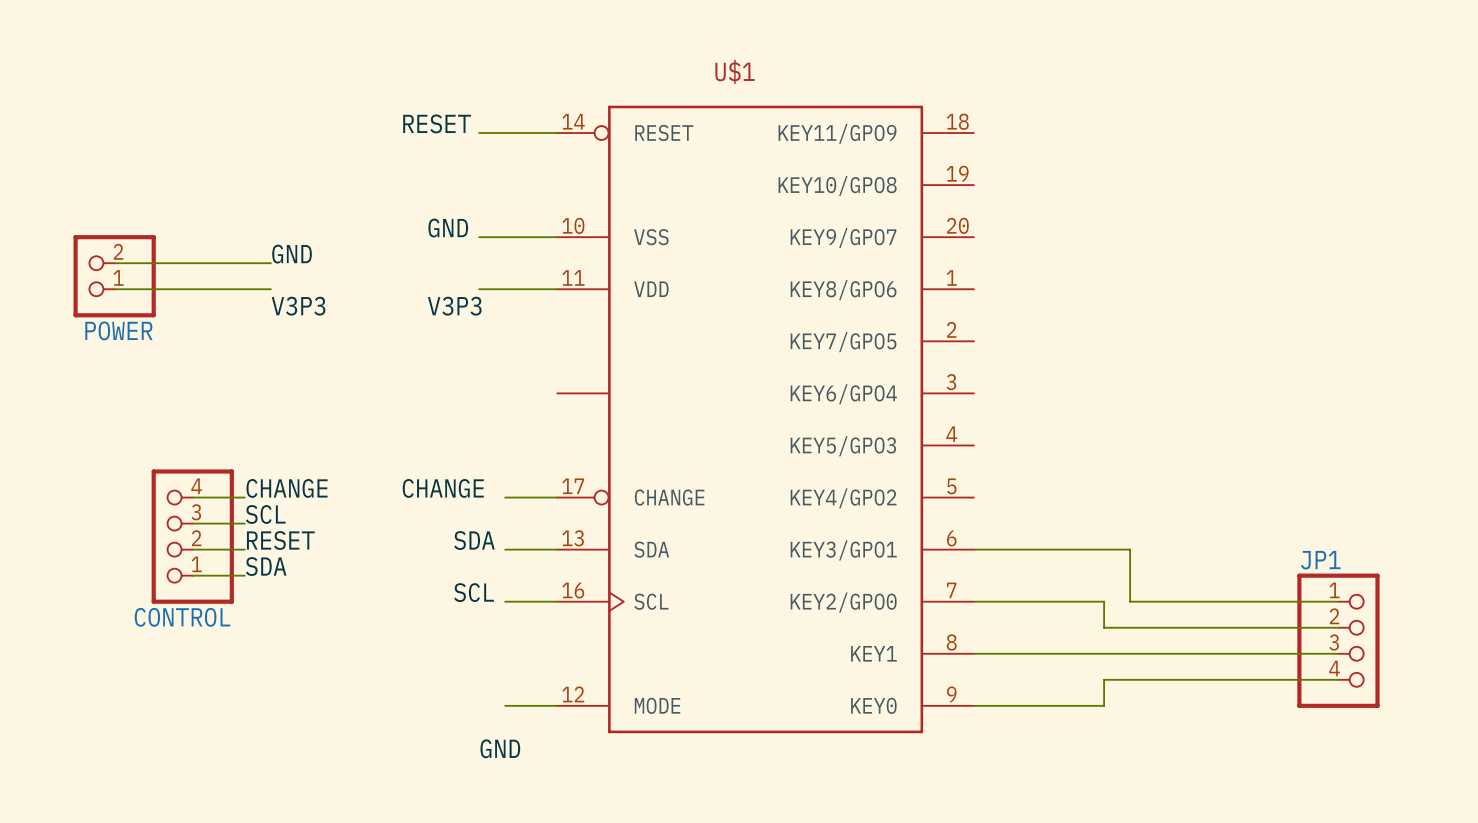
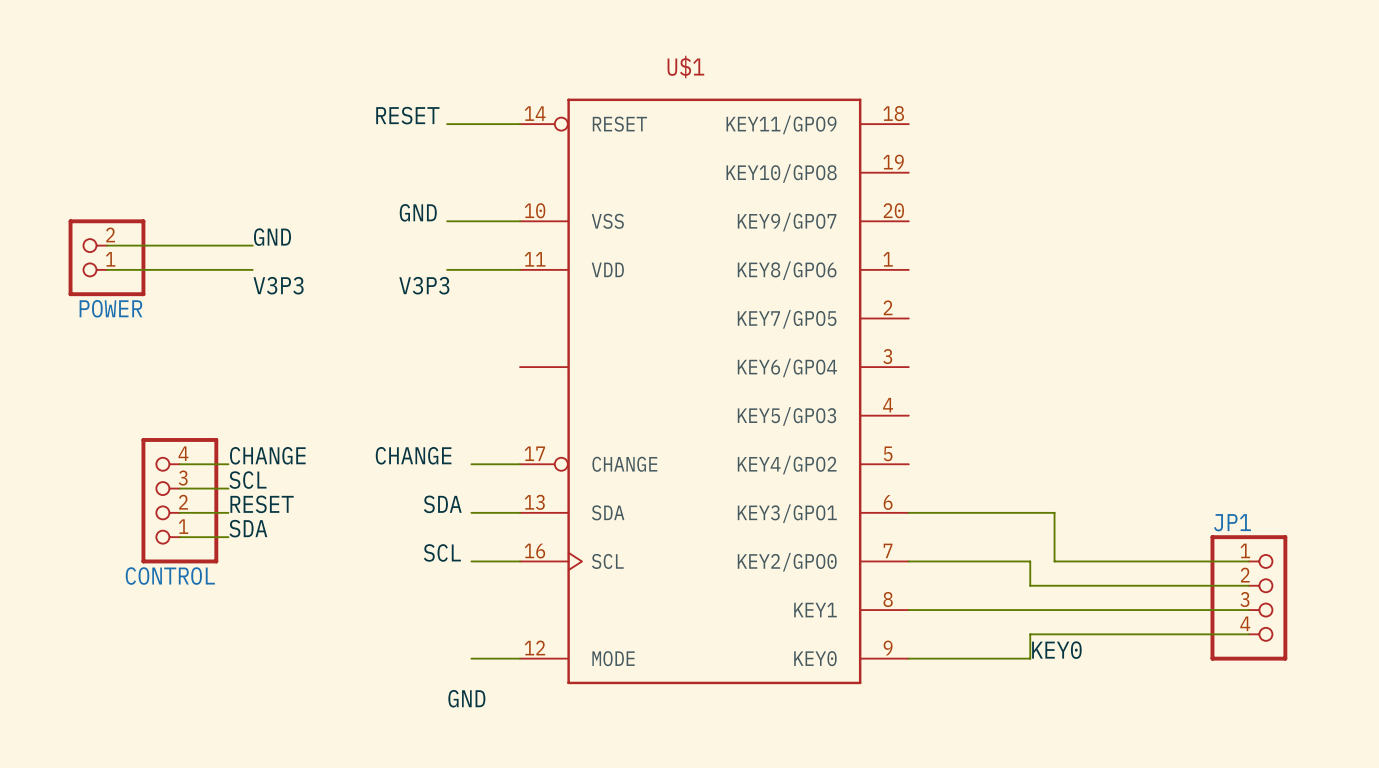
label: none -> KEY0 (1056, 650)

